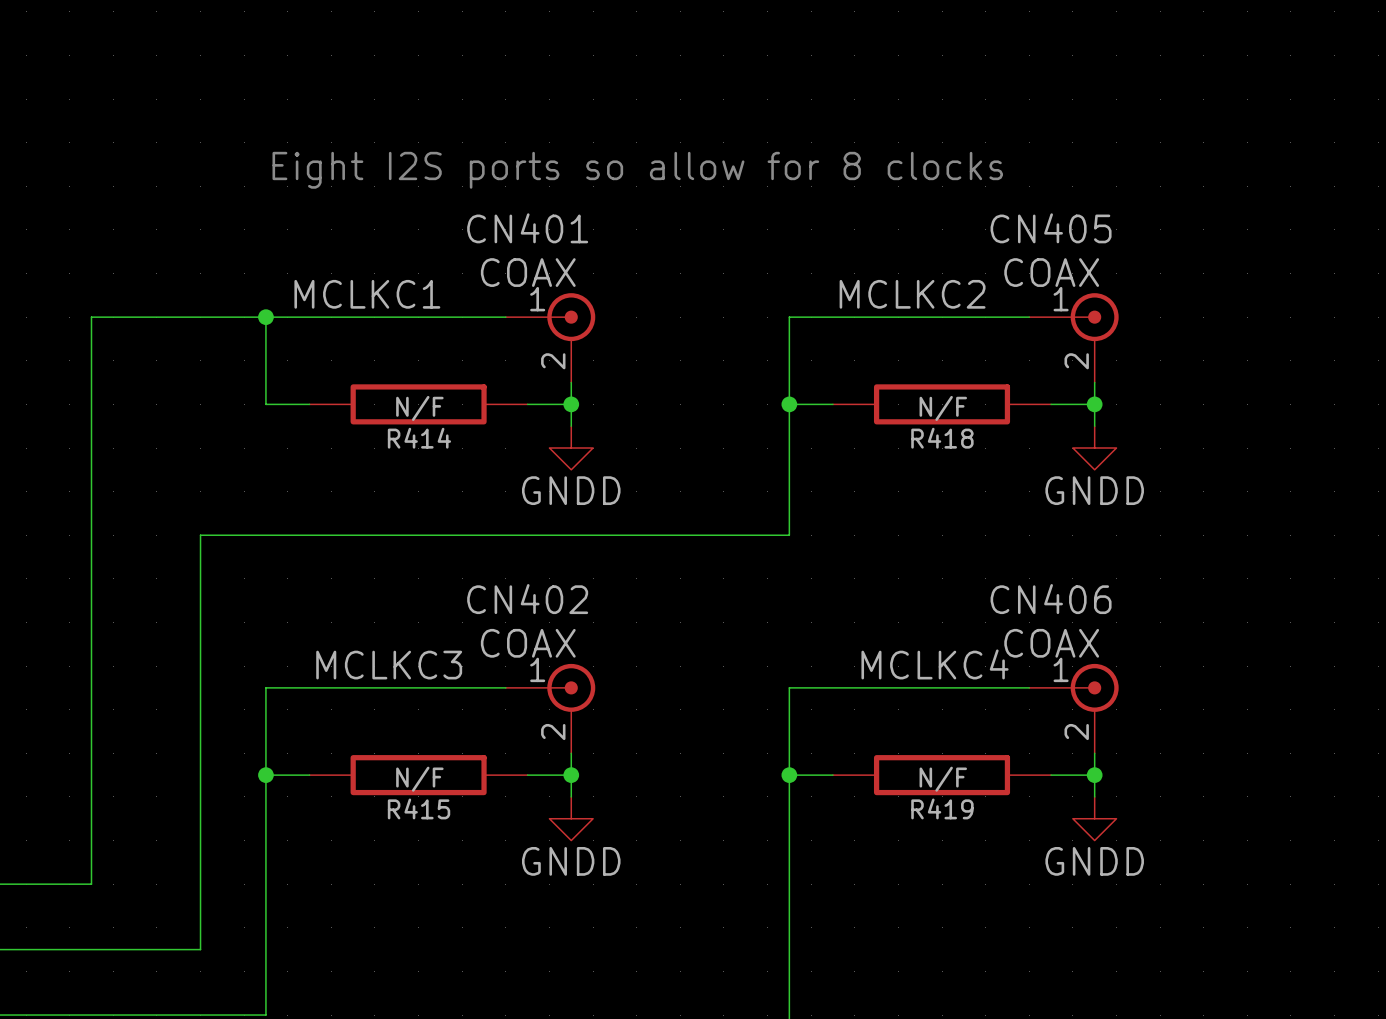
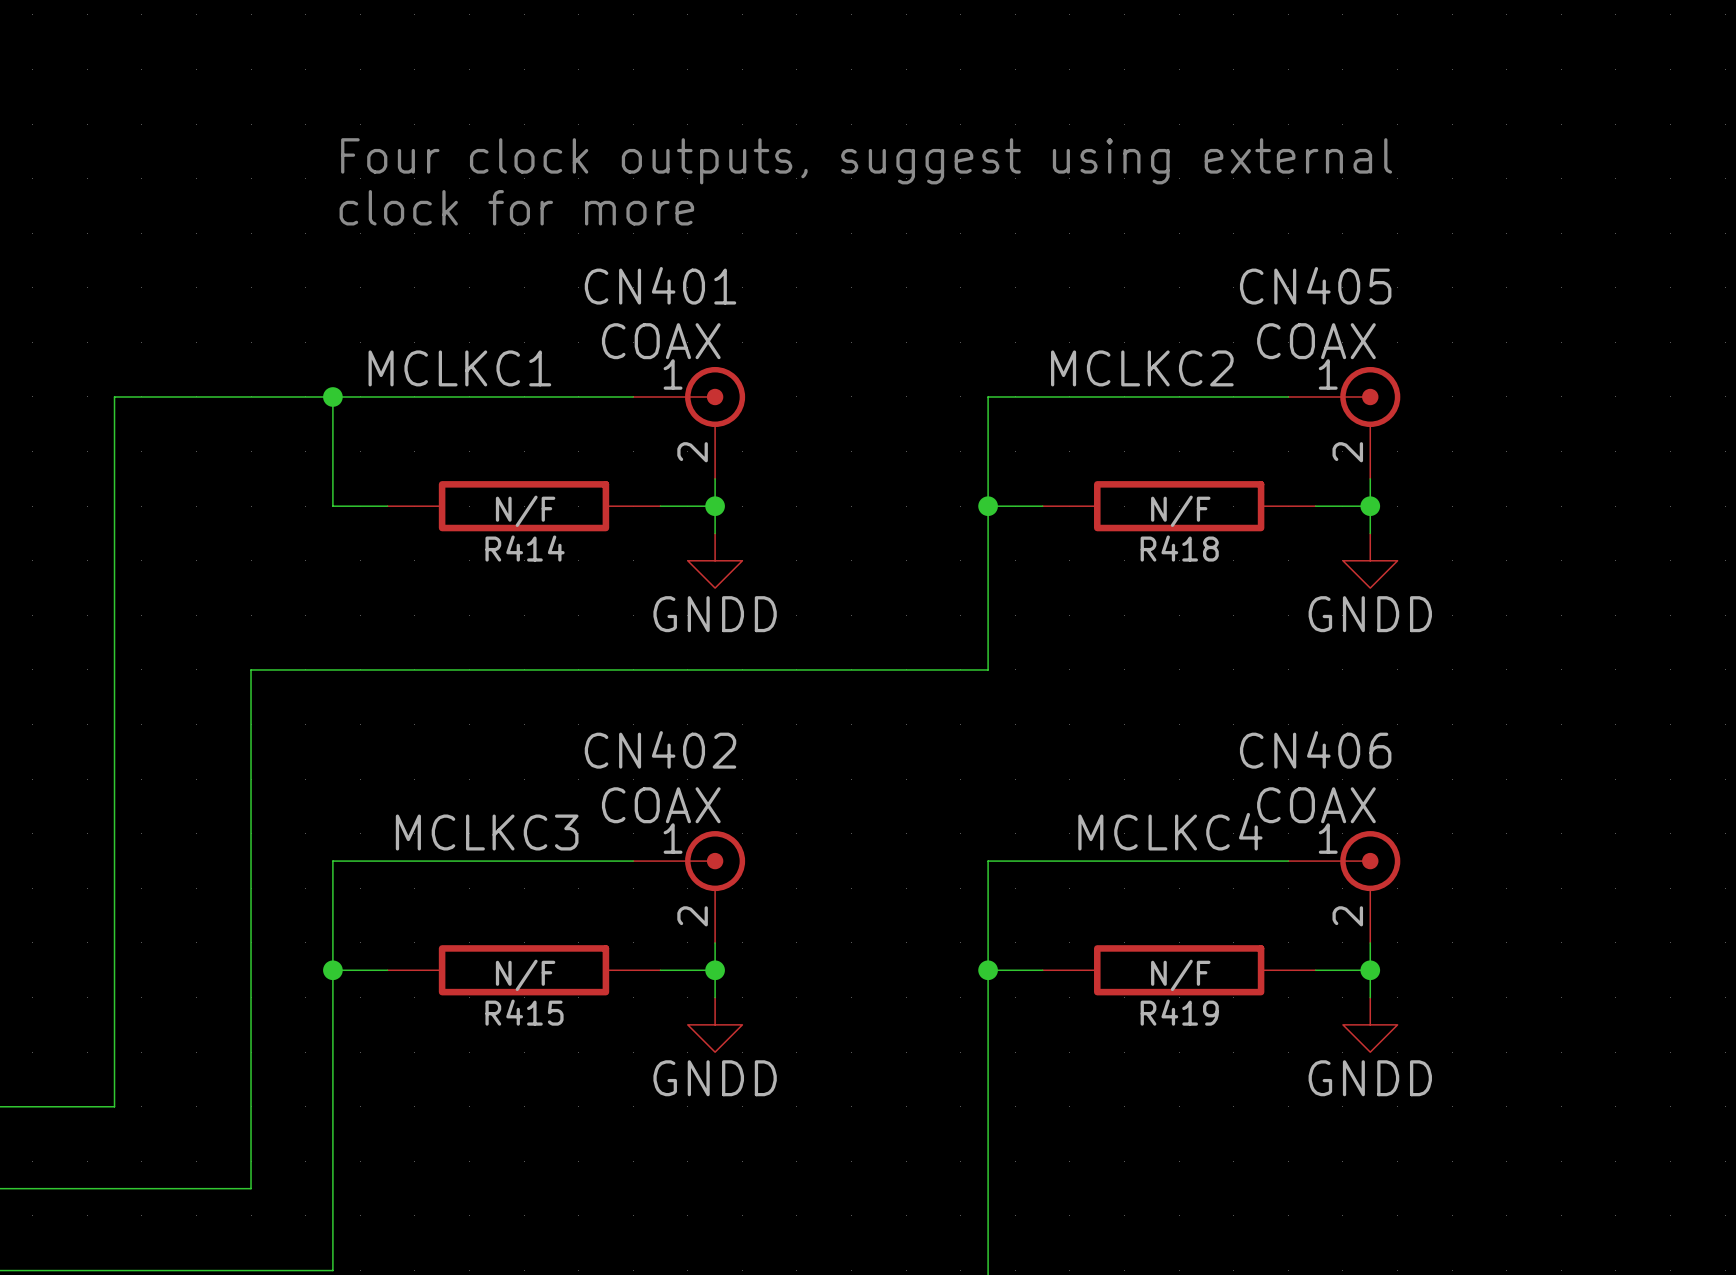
text: none -> Four clock outputs, suggest using external (866, 161)
text: Eight I2S ports so allow for 8 clocks (637, 170) -> clock for more (516, 207)

